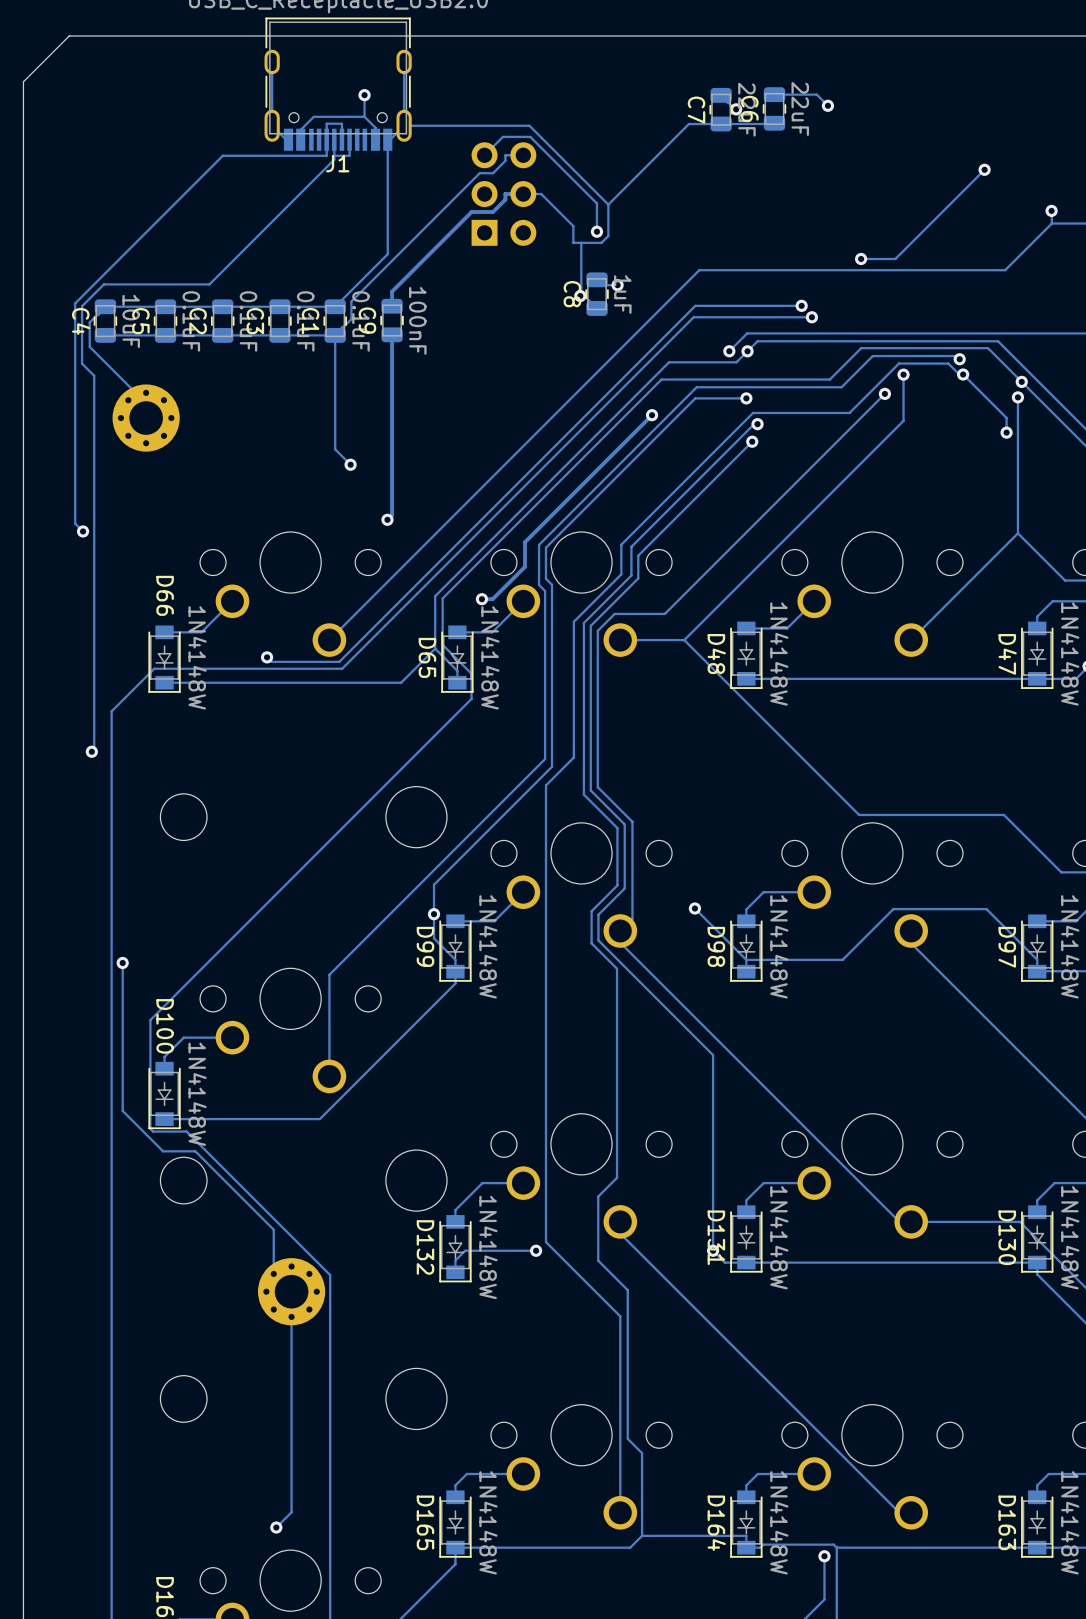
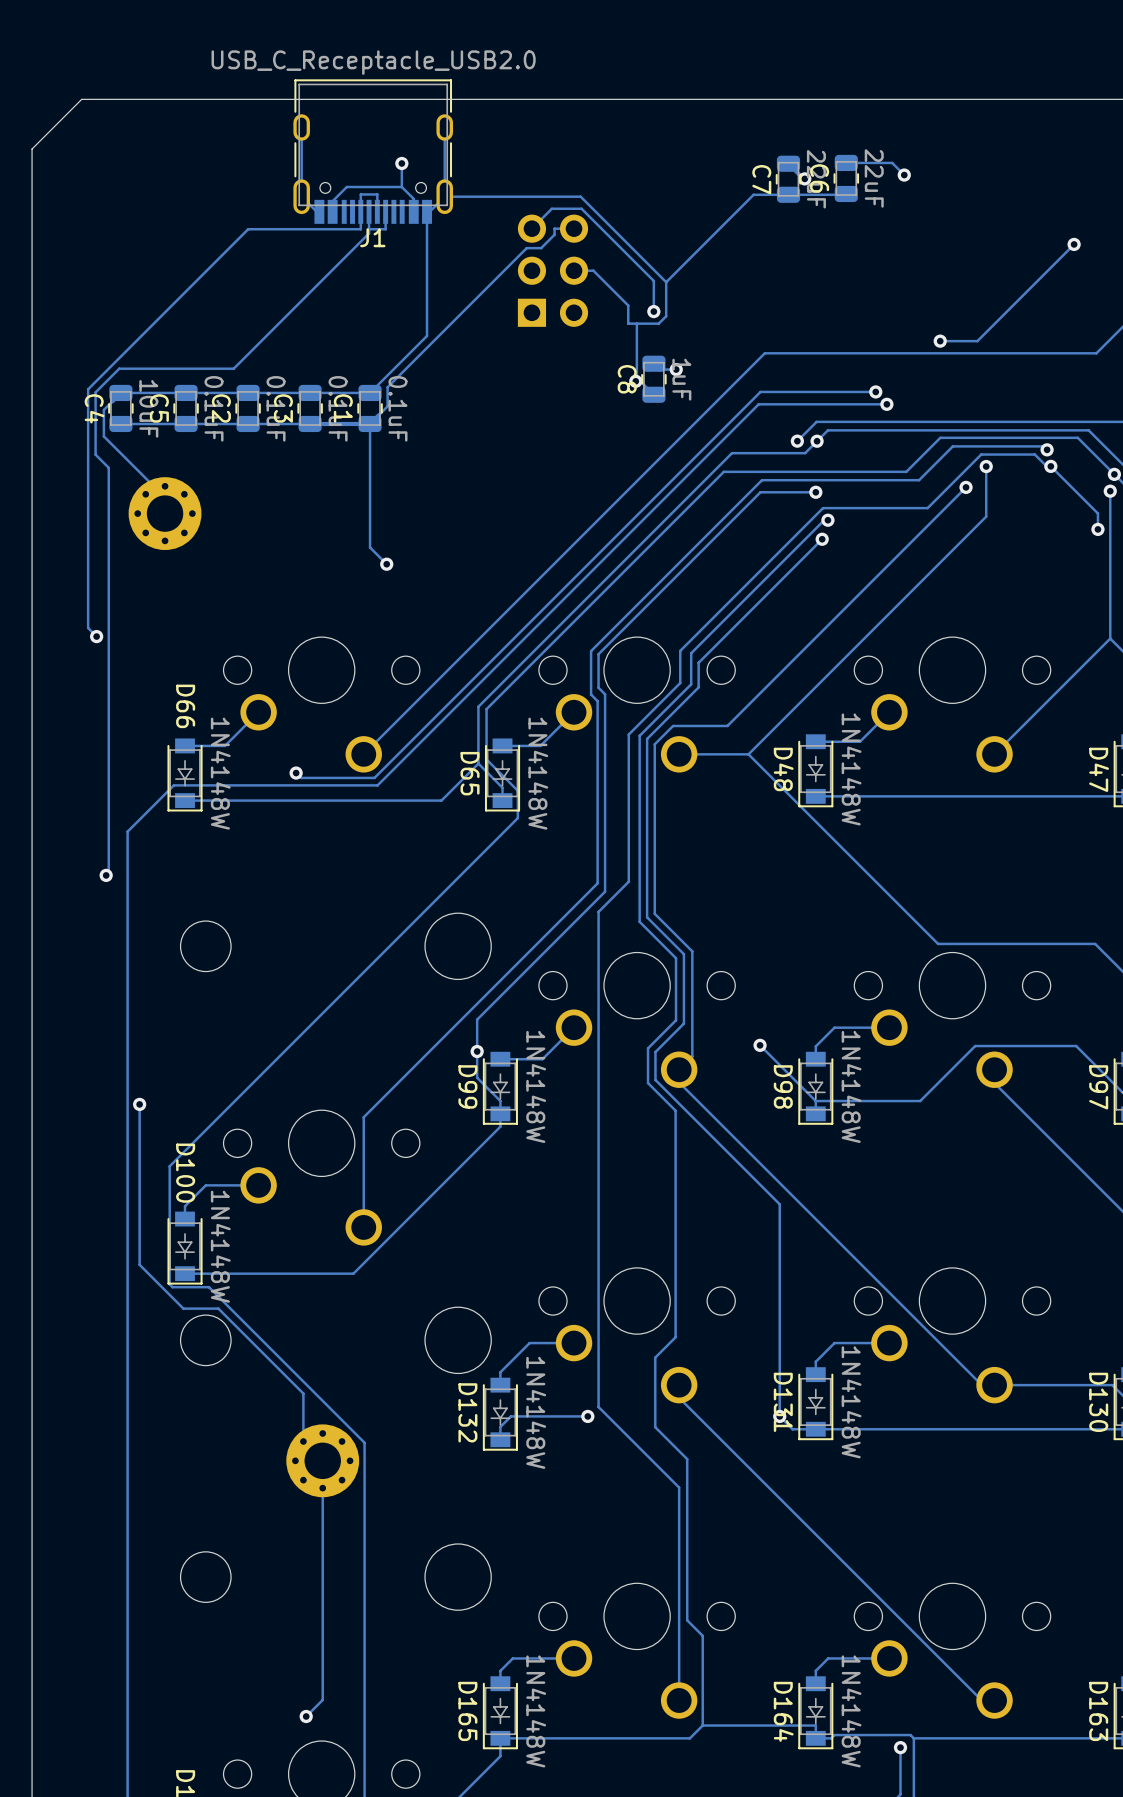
track: (523, 194) (505, 194) (505, 199) (493, 211) (471, 211) (392, 291) (392, 306) -> none
C9: 100nF (392, 320) -> none
track: (392, 334) (392, 515) (387, 519) -> none
track: (652, 415) (525, 542) (525, 566) (492, 599) (481, 599) -> none
via: (652, 415) -> none
via: (387, 519) -> none
via: (481, 599) -> none

